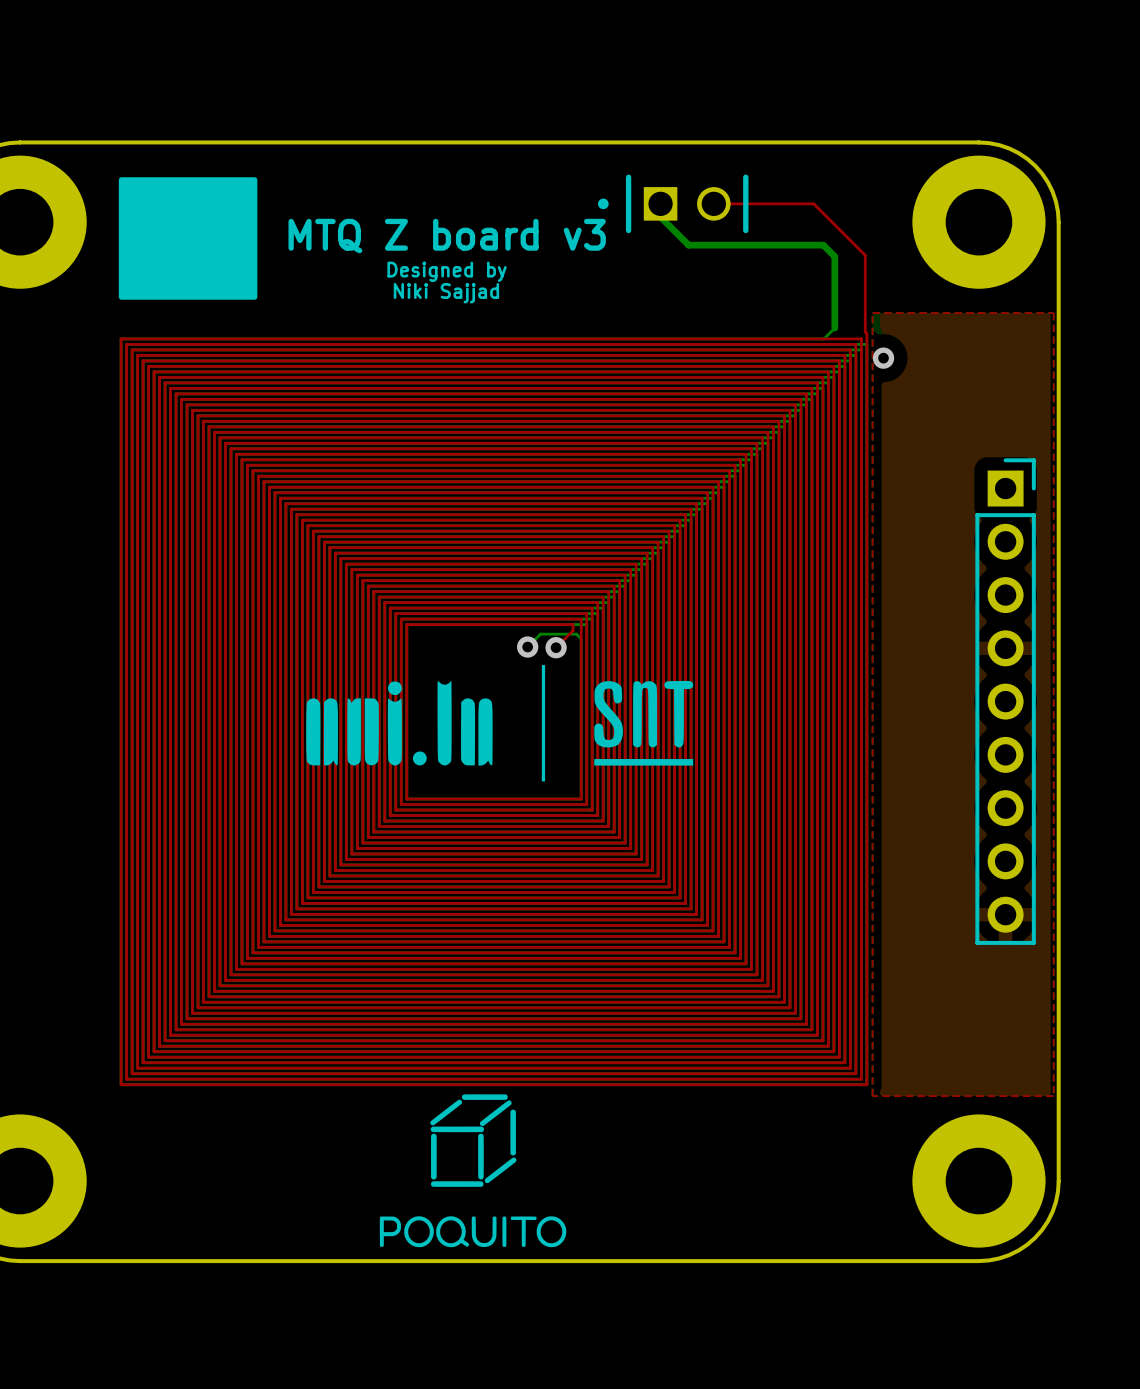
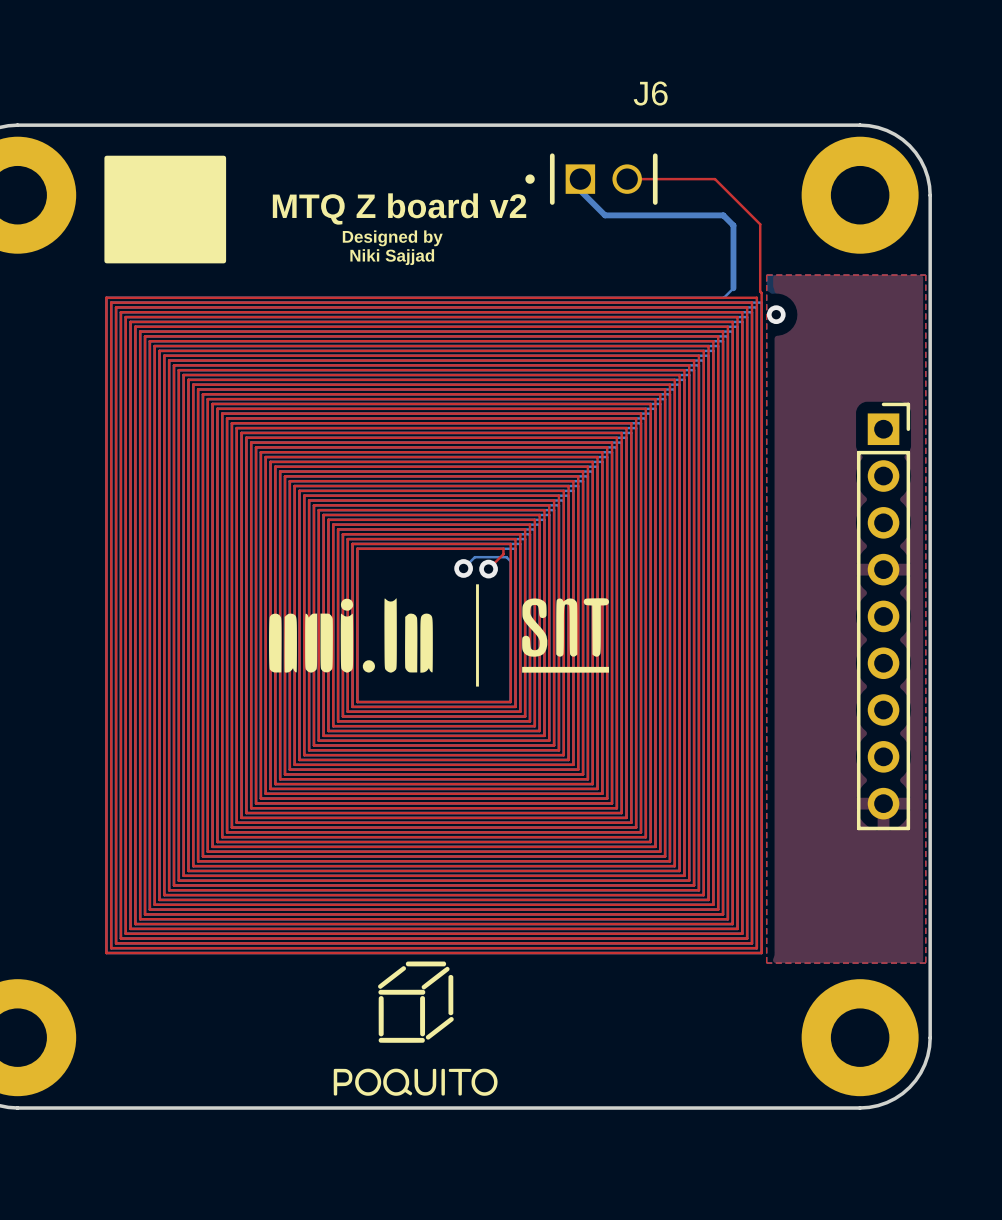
J6 name: none -> J6 (650, 93)
text: MTQ Z board v3 (447, 236) -> MTQ Z board v2 (399, 208)

